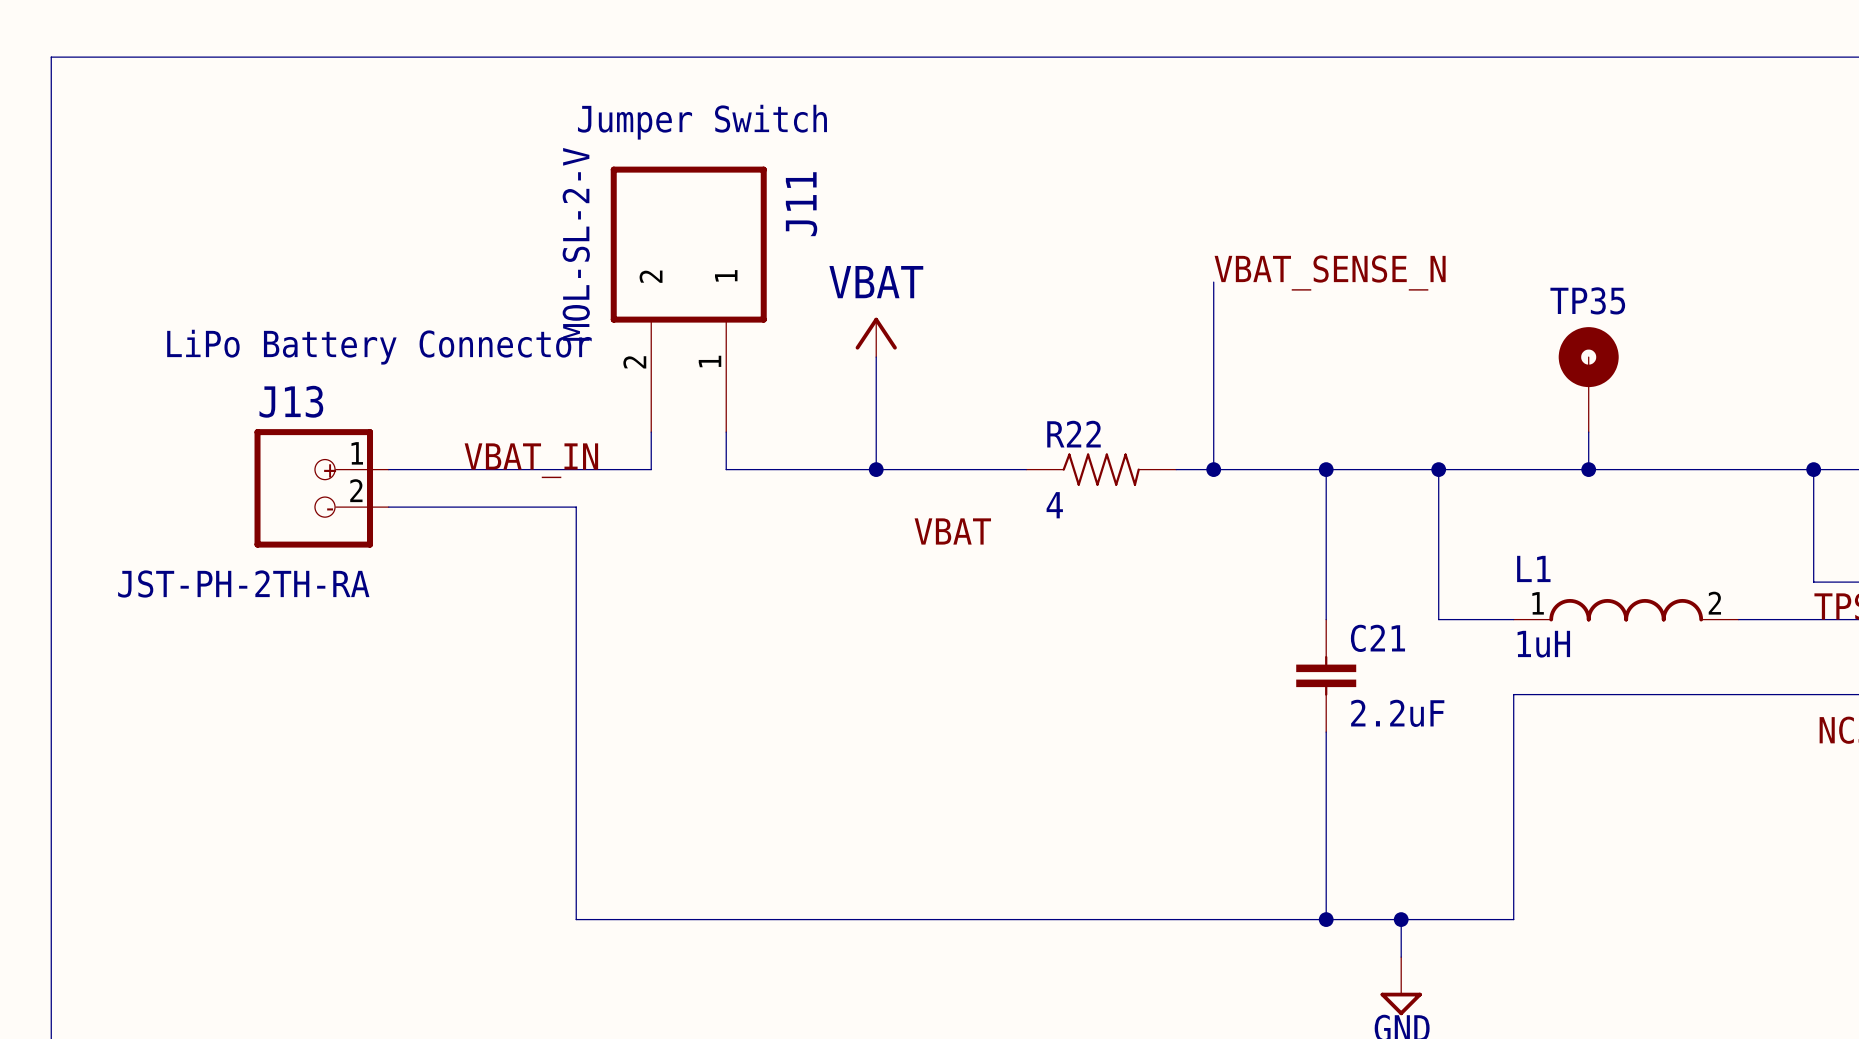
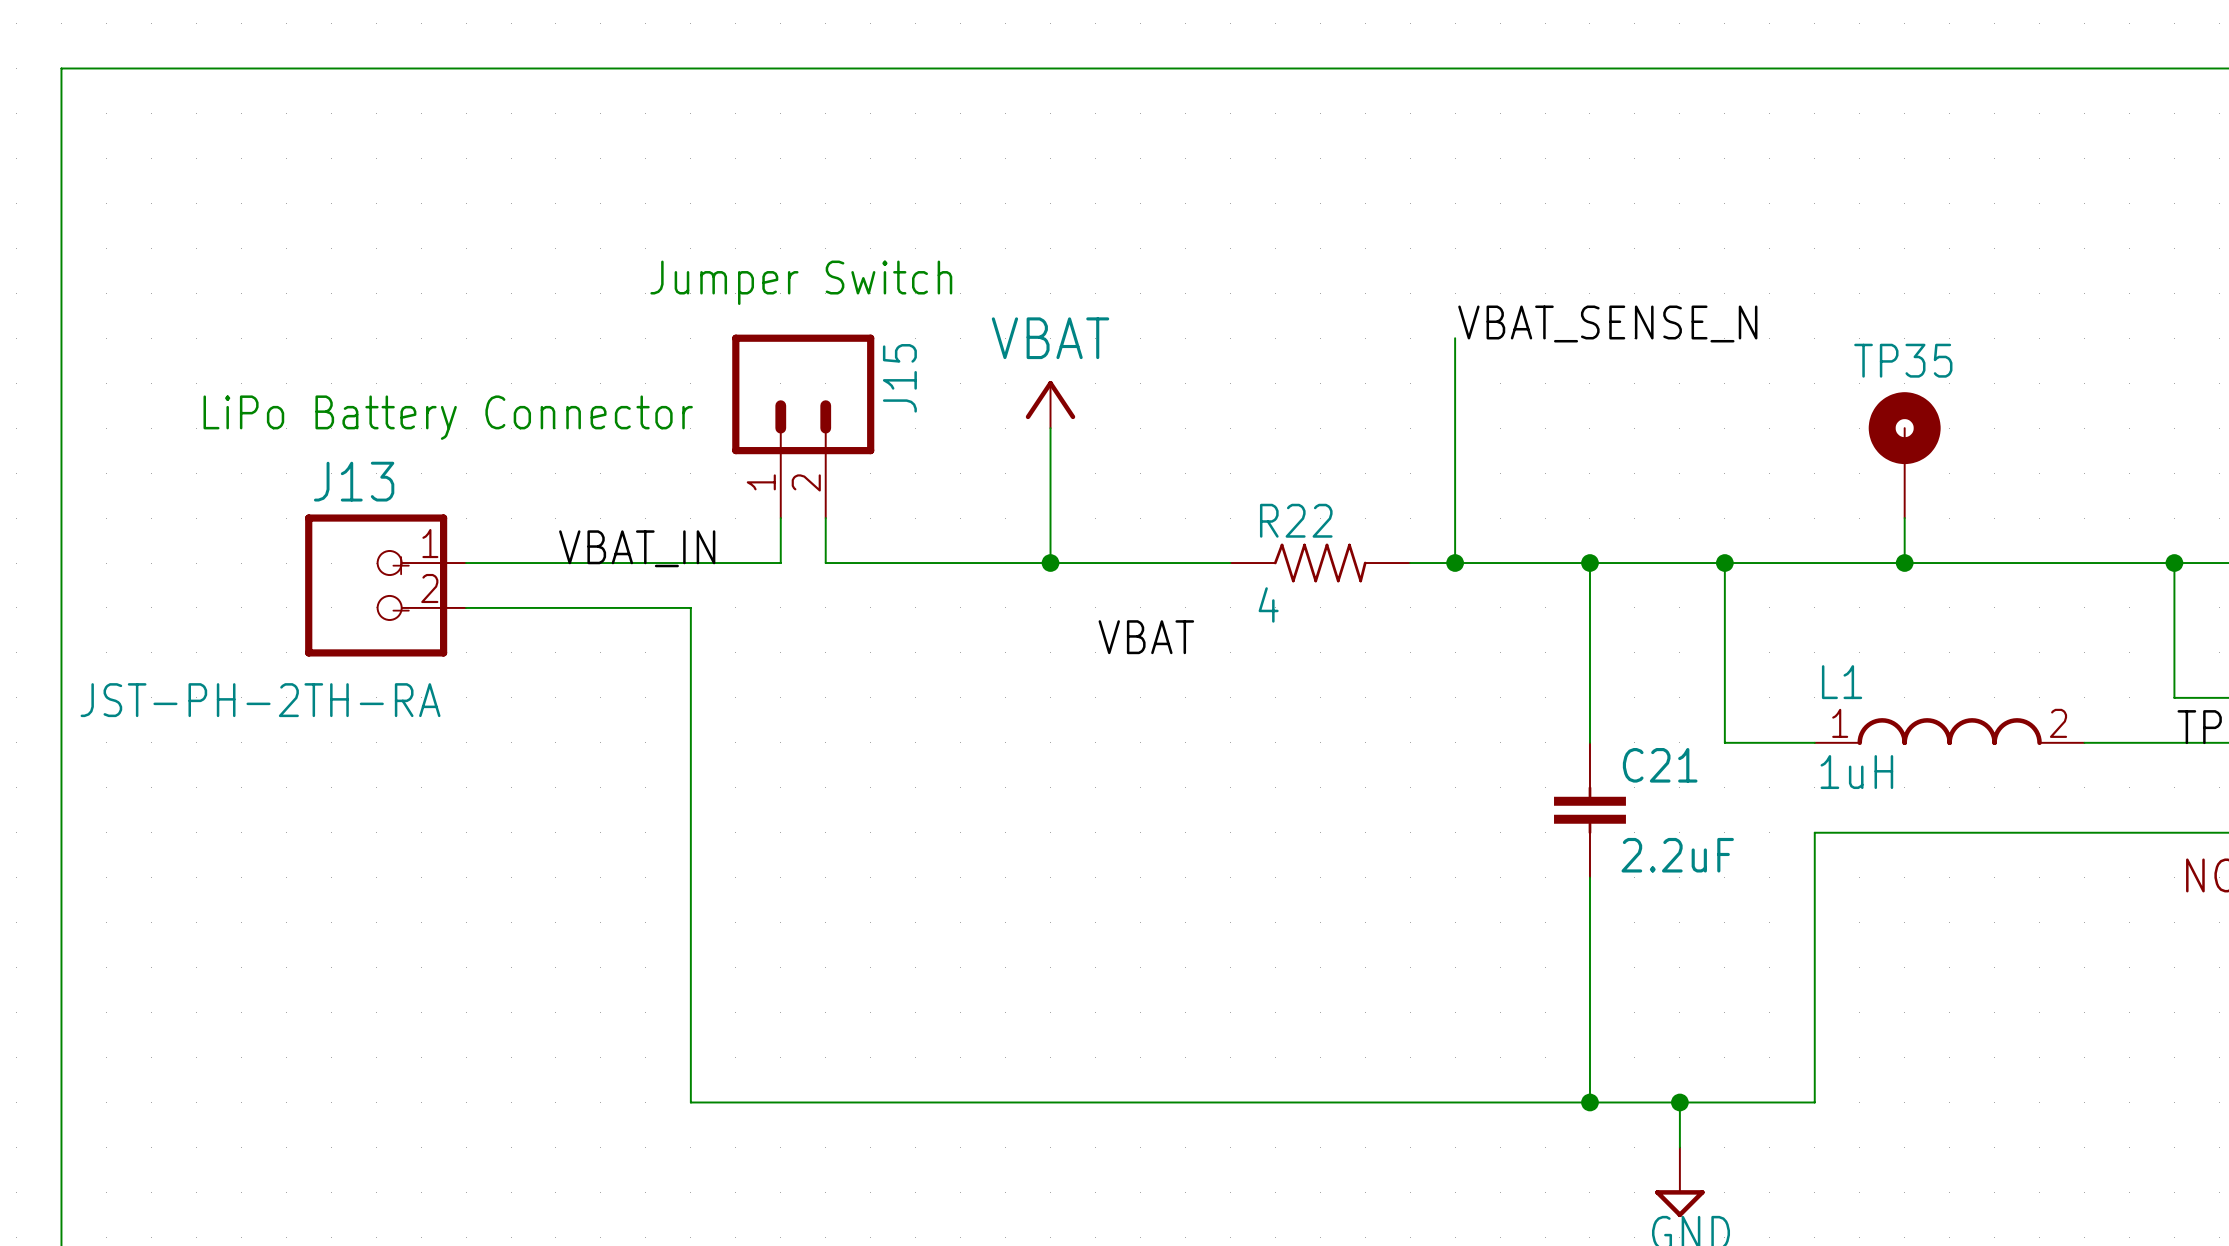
text position: Jumper Switch (702, 122) -> Jumper Switch (801, 282)
J11: MOL-SL-2-V (688, 299) -> none
J15: none -> (803, 426)
wire: (726, 432) (726, 469) -> (825, 518) (825, 563) (870, 563)

